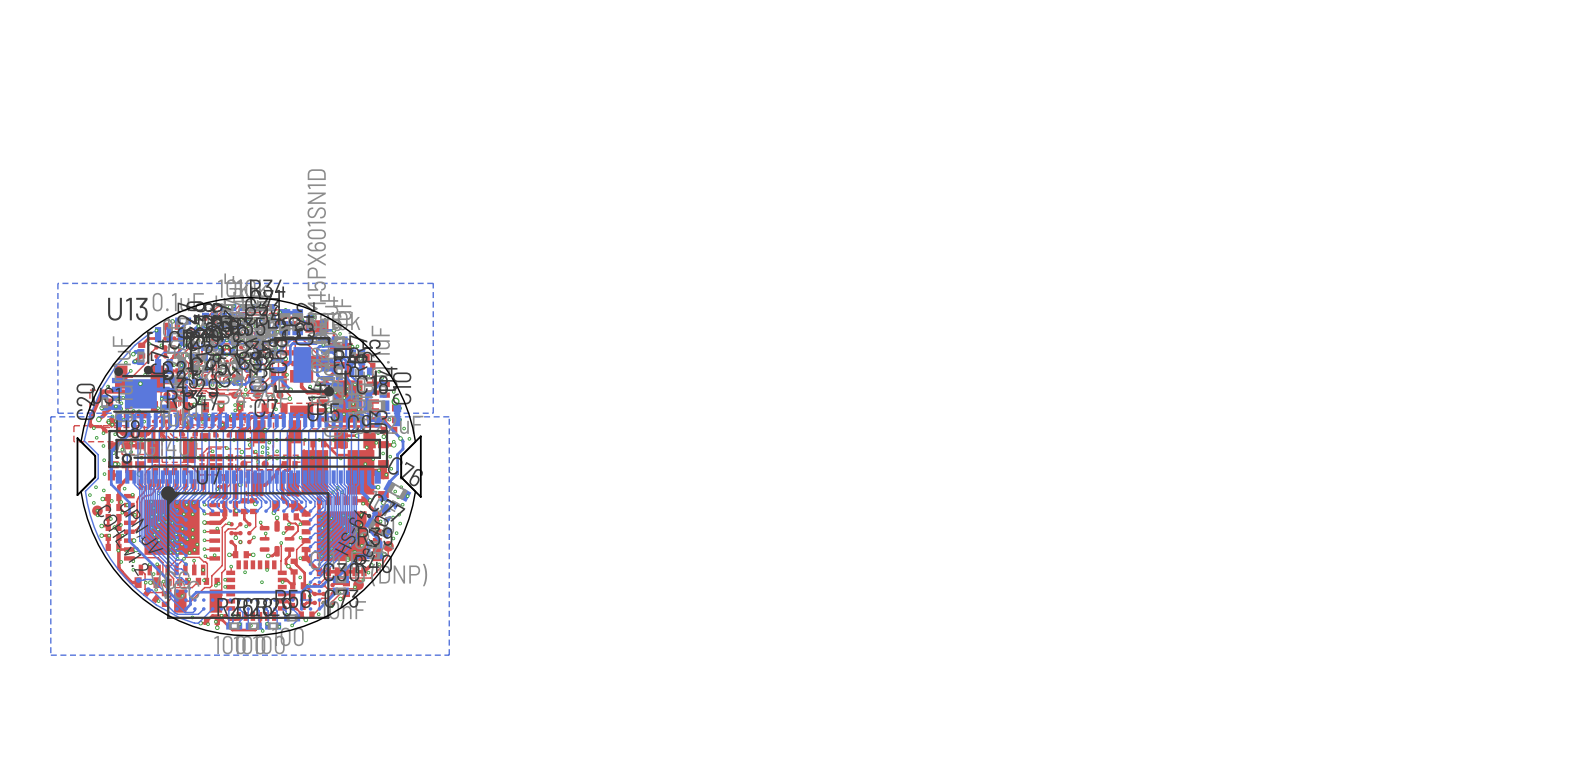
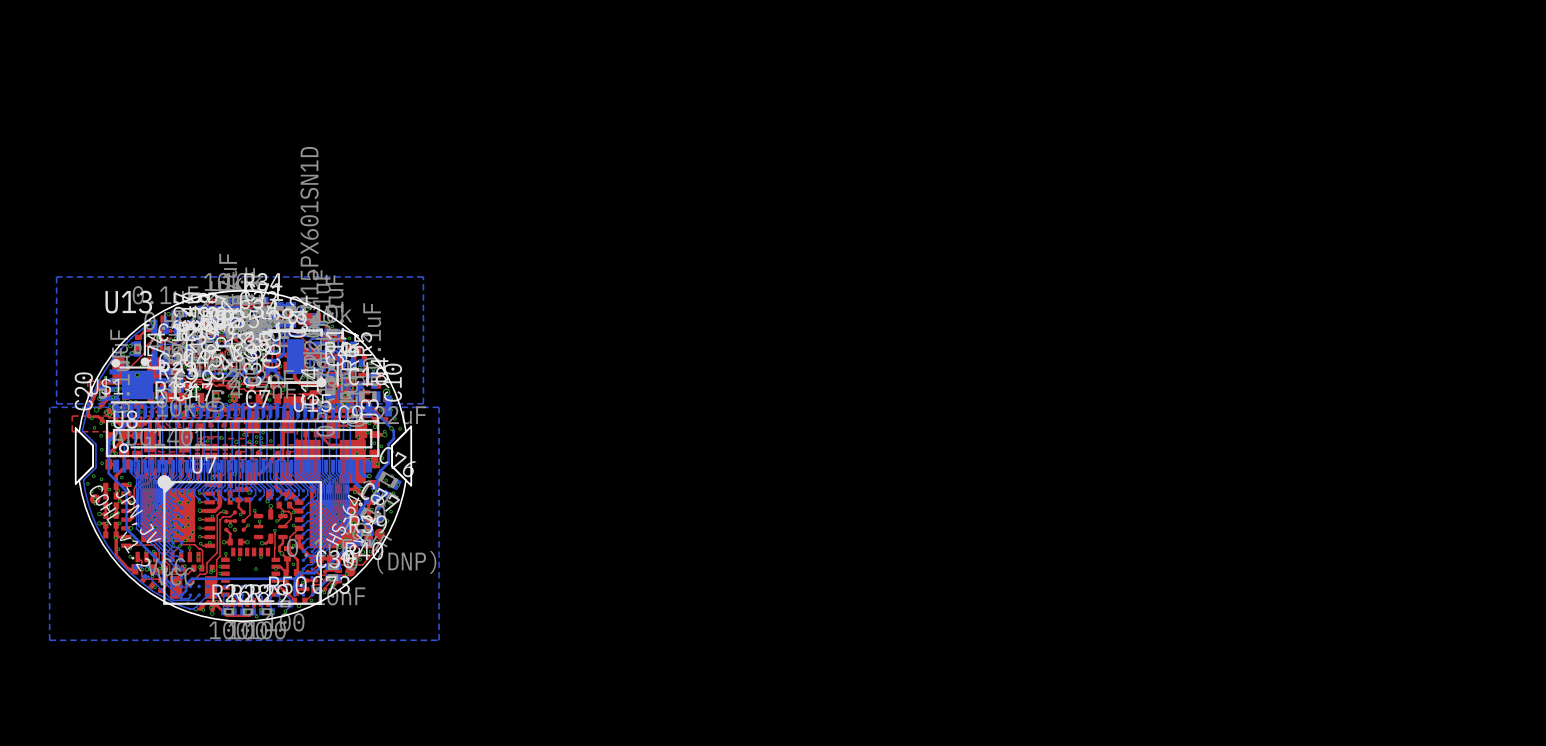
top track: none -> (124, 435) (124, 438) (110, 454)

